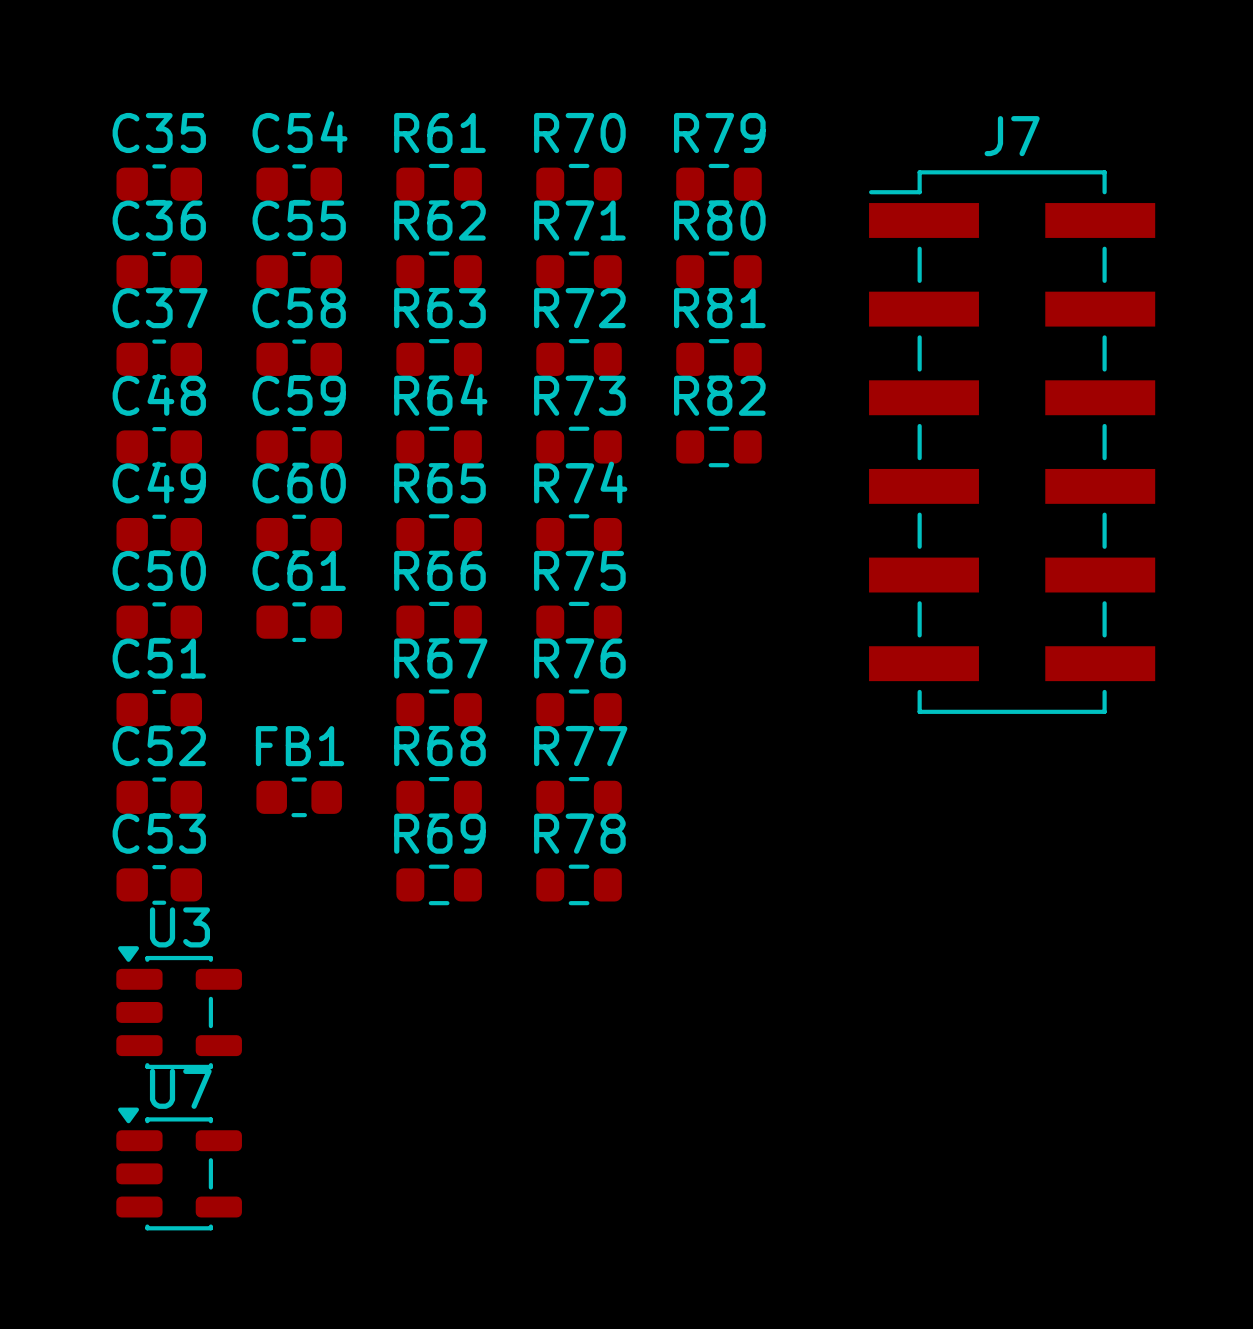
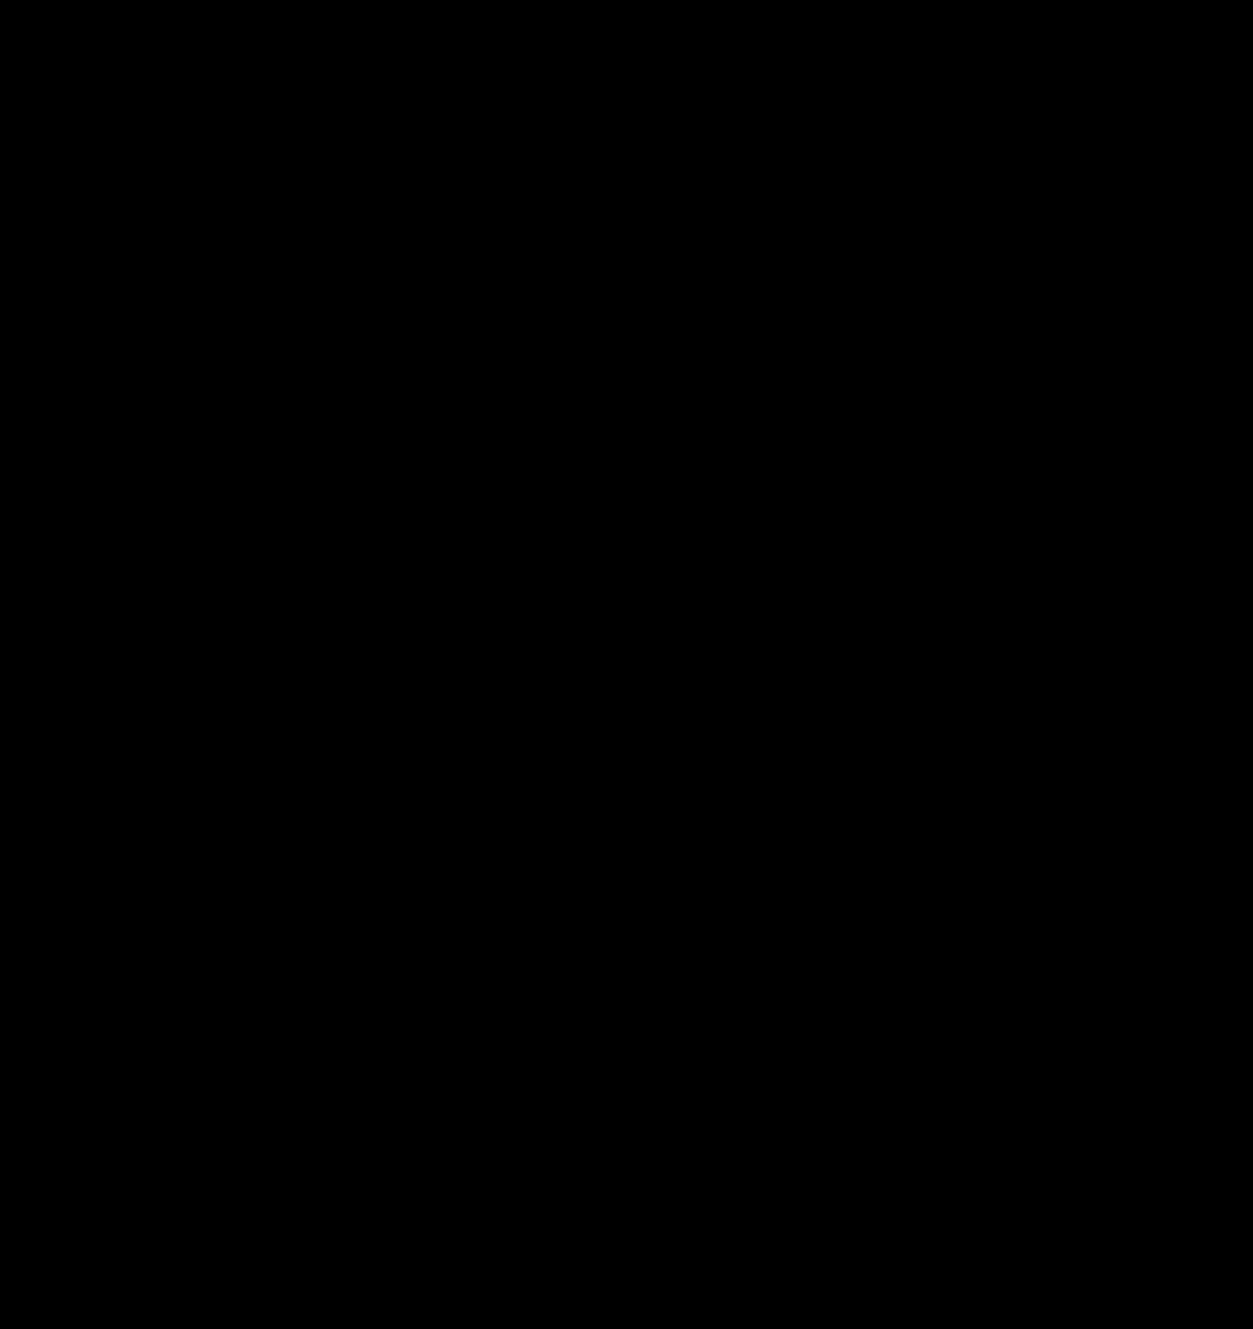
C35: (159, 184) -> none
C54: (299, 184) -> none
R61: (439, 184) -> none
R70: (579, 184) -> none
R79: (718, 184) -> none
C36: (159, 271) -> none
C55: (299, 271) -> none
R62: (439, 271) -> none
R71: (579, 271) -> none
R80: (718, 271) -> none
C37: (159, 359) -> none
C58: (299, 359) -> none
R63: (439, 359) -> none
R72: (579, 359) -> none
R81: (718, 359) -> none
J7: (1012, 442) -> none
C48: (159, 446) -> none
C59: (299, 446) -> none
R64: (439, 446) -> none
R73: (579, 446) -> none
R82: (718, 446) -> none
C49: (159, 534) -> none
C60: (299, 534) -> none
R65: (439, 534) -> none
R74: (579, 534) -> none
C50: (159, 622) -> none
C61: (299, 622) -> none
R66: (439, 622) -> none
R75: (579, 622) -> none
C51: (159, 709) -> none
R67: (439, 709) -> none
R76: (579, 709) -> none
C52: (159, 797) -> none
FB1: (299, 797) -> none
R68: (439, 797) -> none
R77: (579, 797) -> none
C53: (159, 884) -> none
R69: (439, 884) -> none
R78: (579, 884) -> none
U3: (179, 1007) -> none
U7: (179, 1168) -> none

